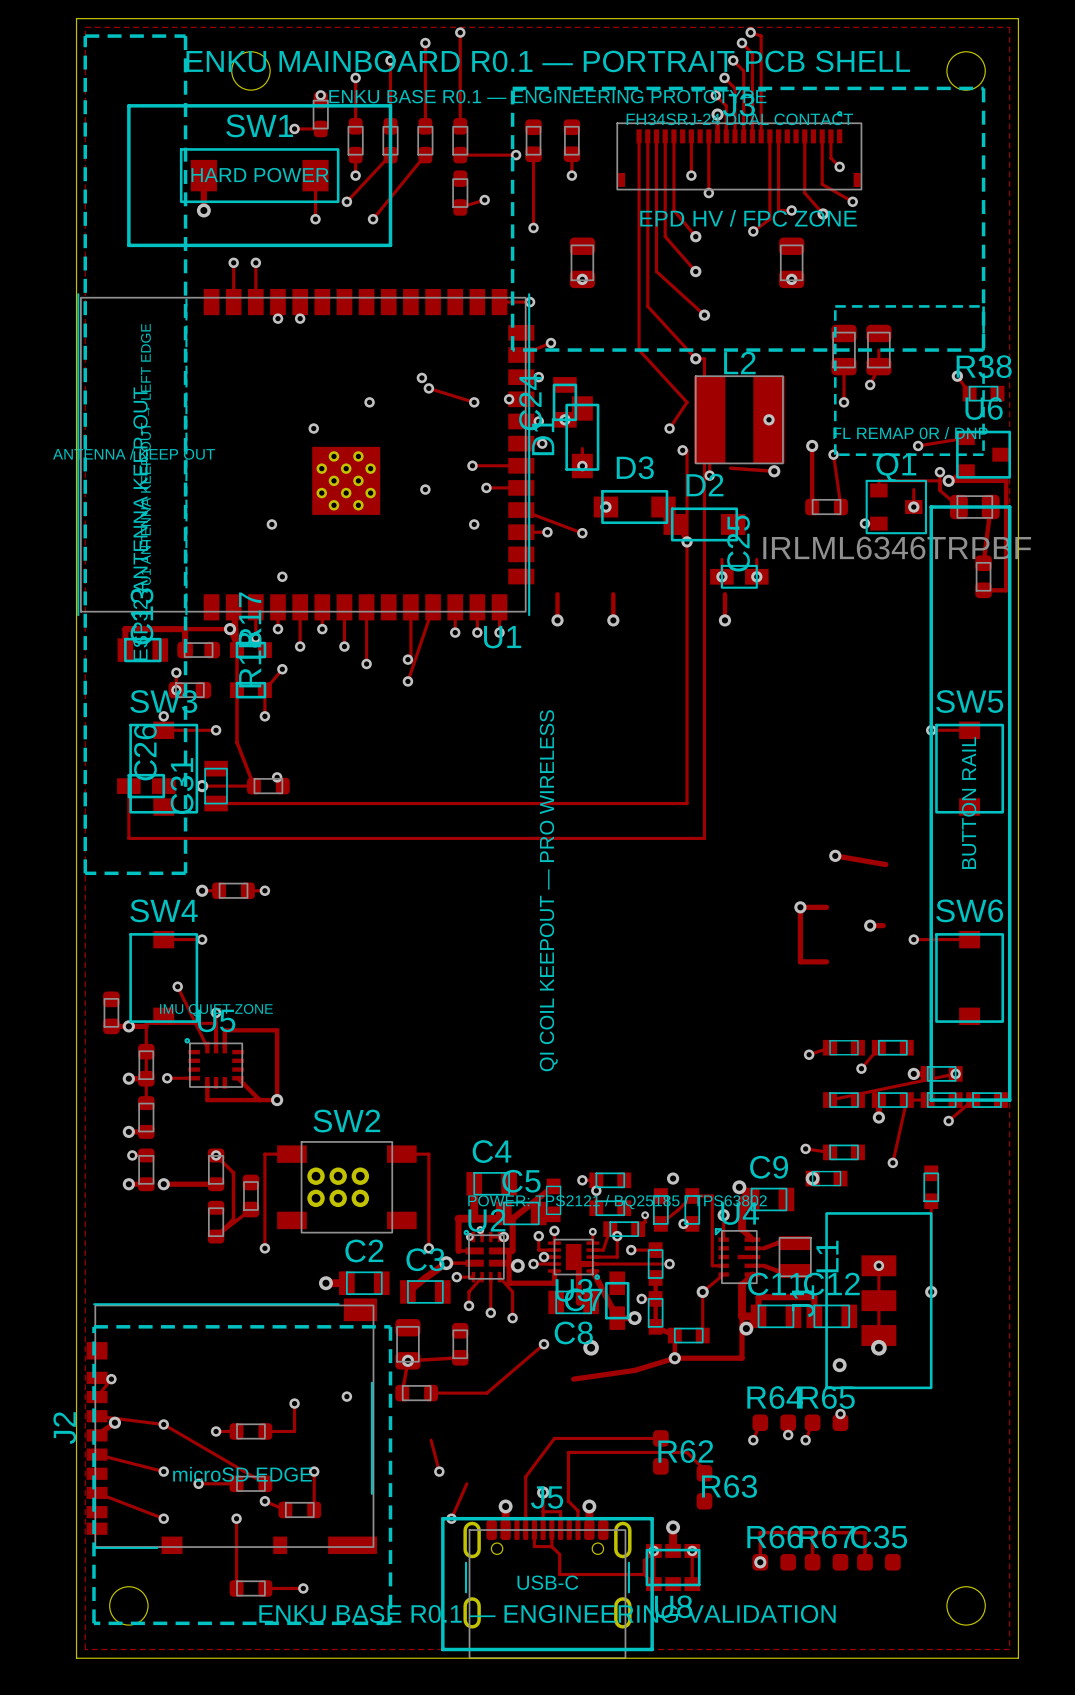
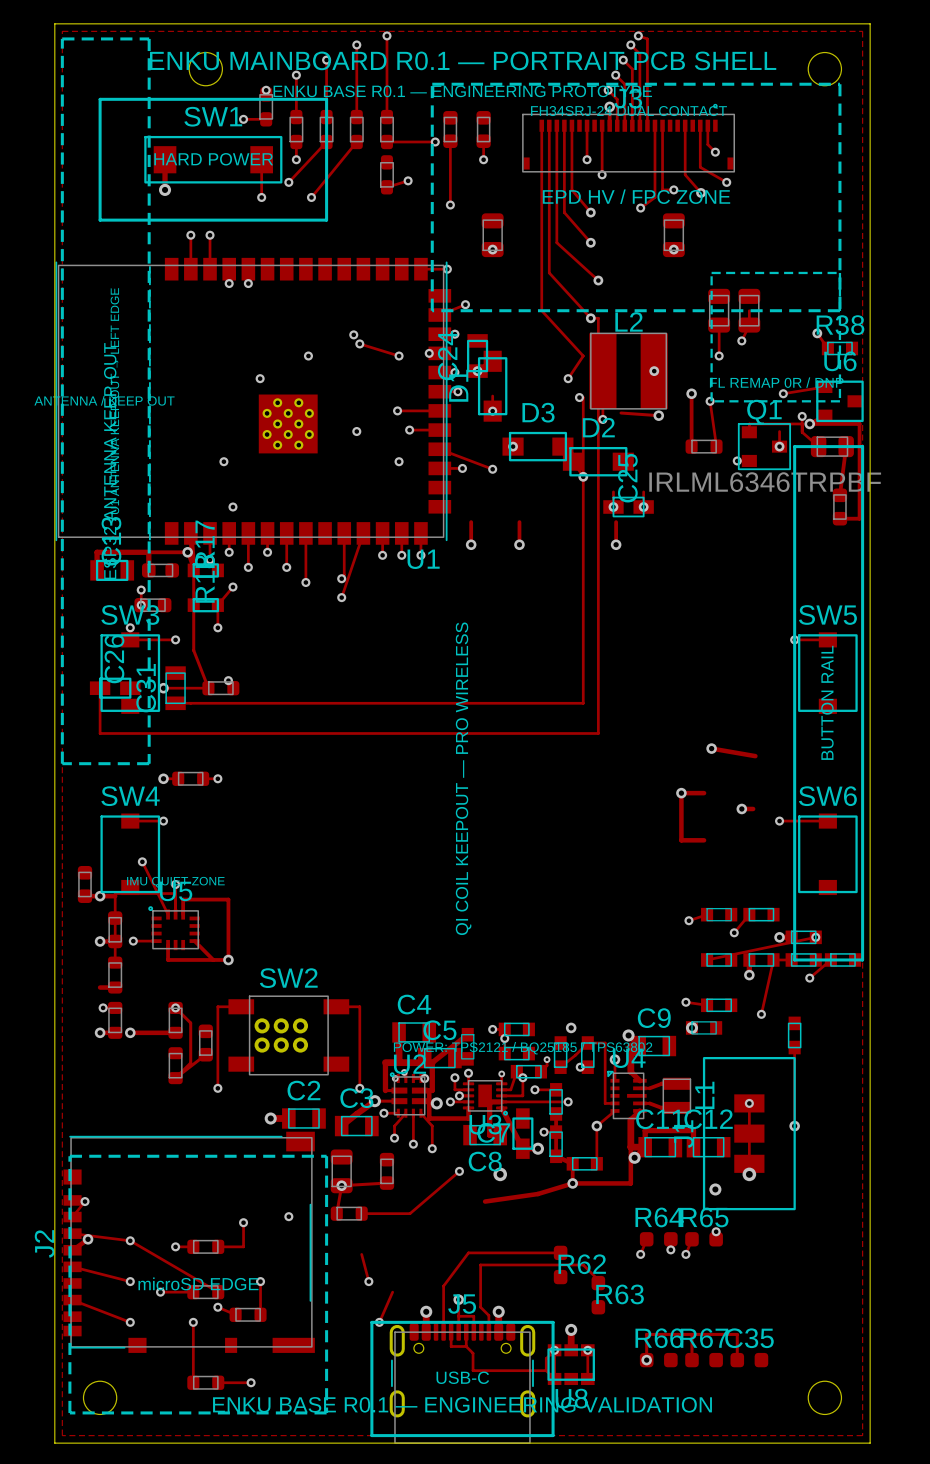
via: (128, 1131) -> none

